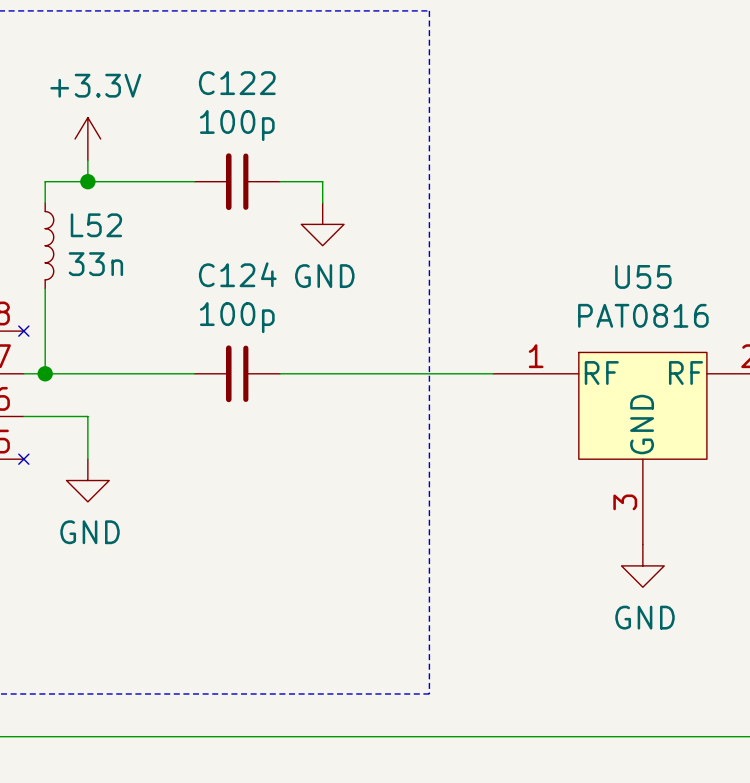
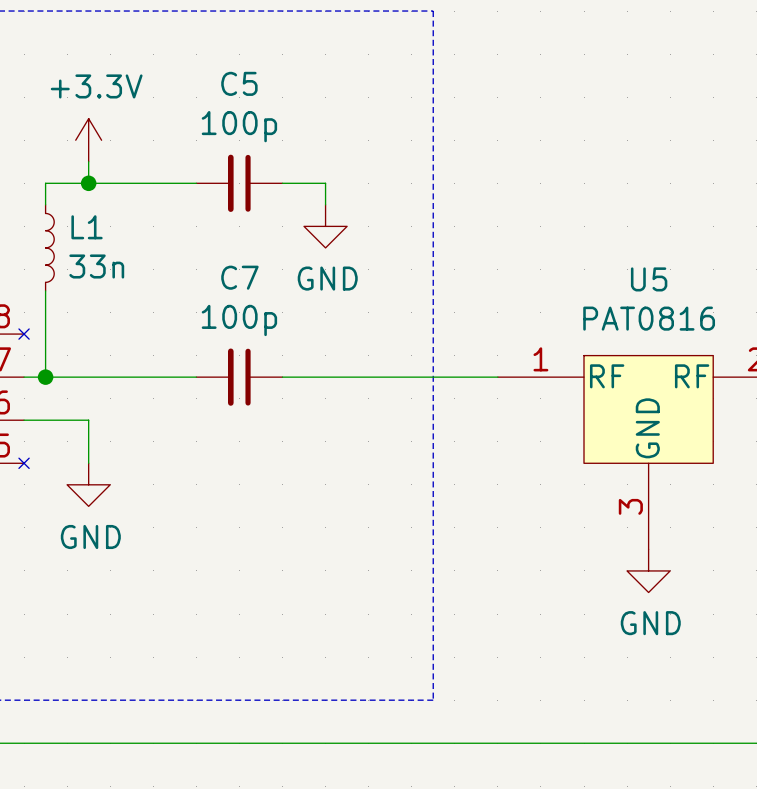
C122 name: C122 (237, 83) -> C5 (239, 83)
L52 name: L52 (96, 225) -> L1 (87, 227)
C124 name: C124 (237, 274) -> C7 (239, 277)
U55 name: U55 (643, 276) -> U5 (649, 279)

